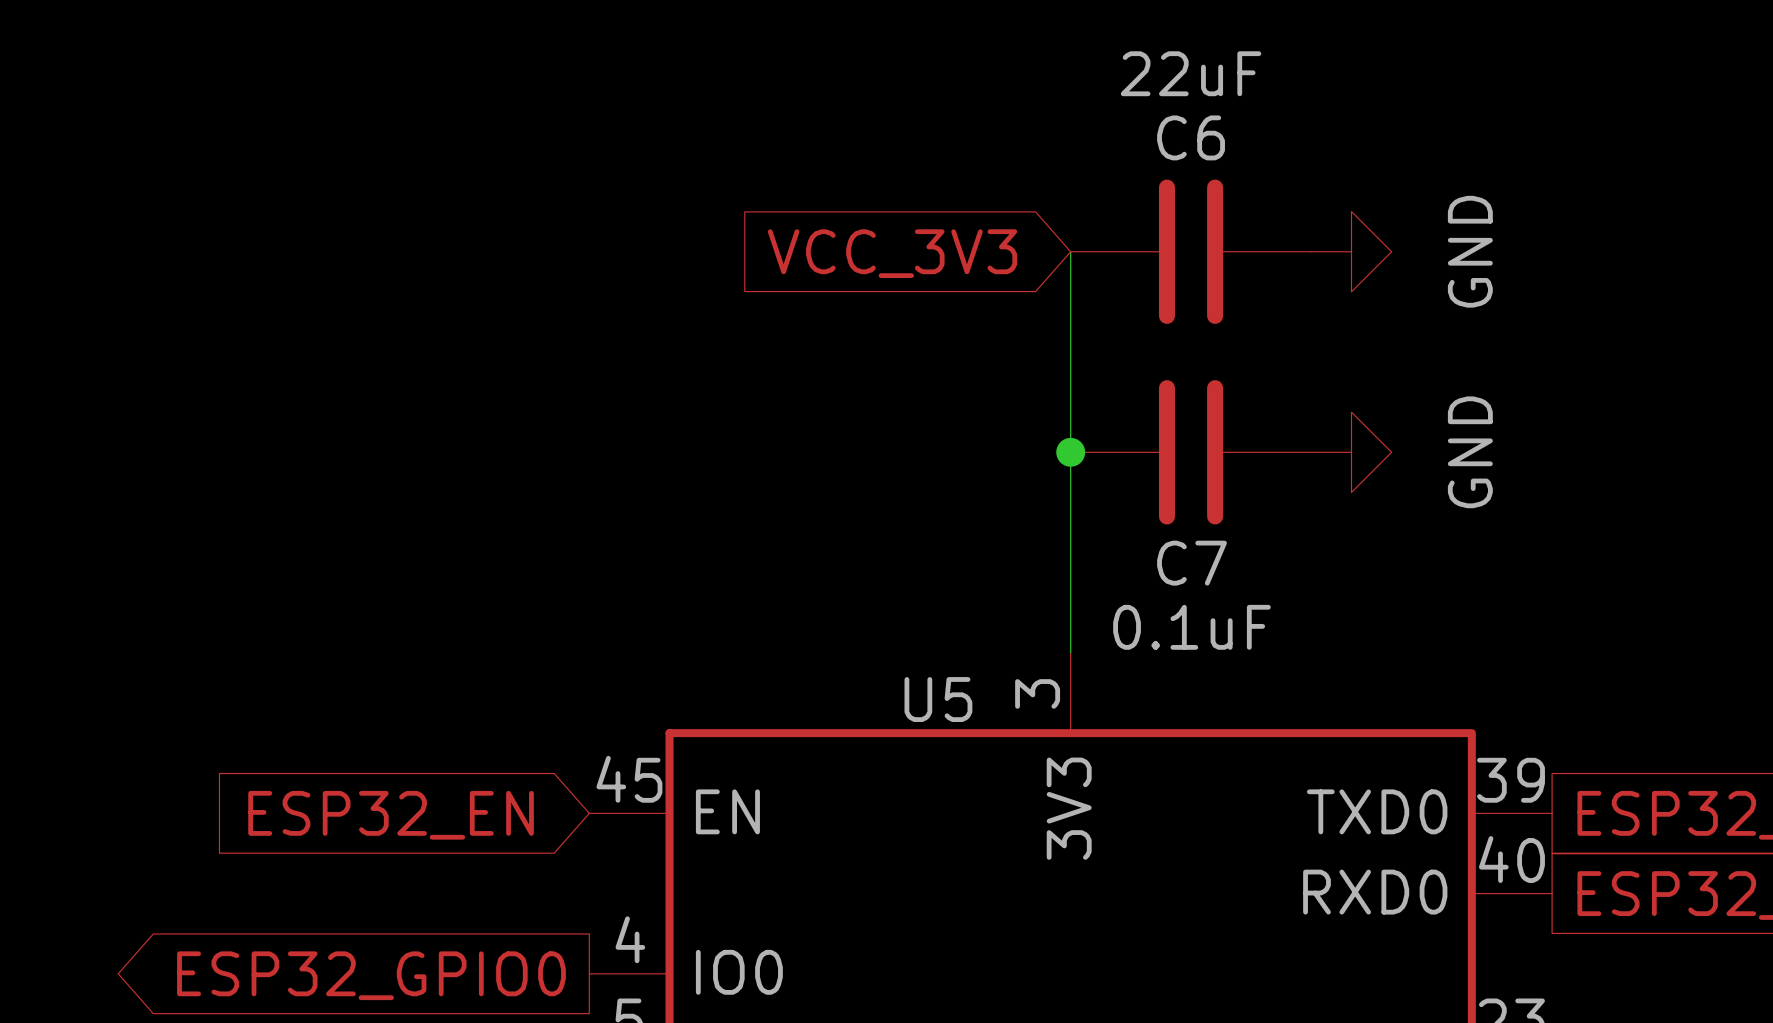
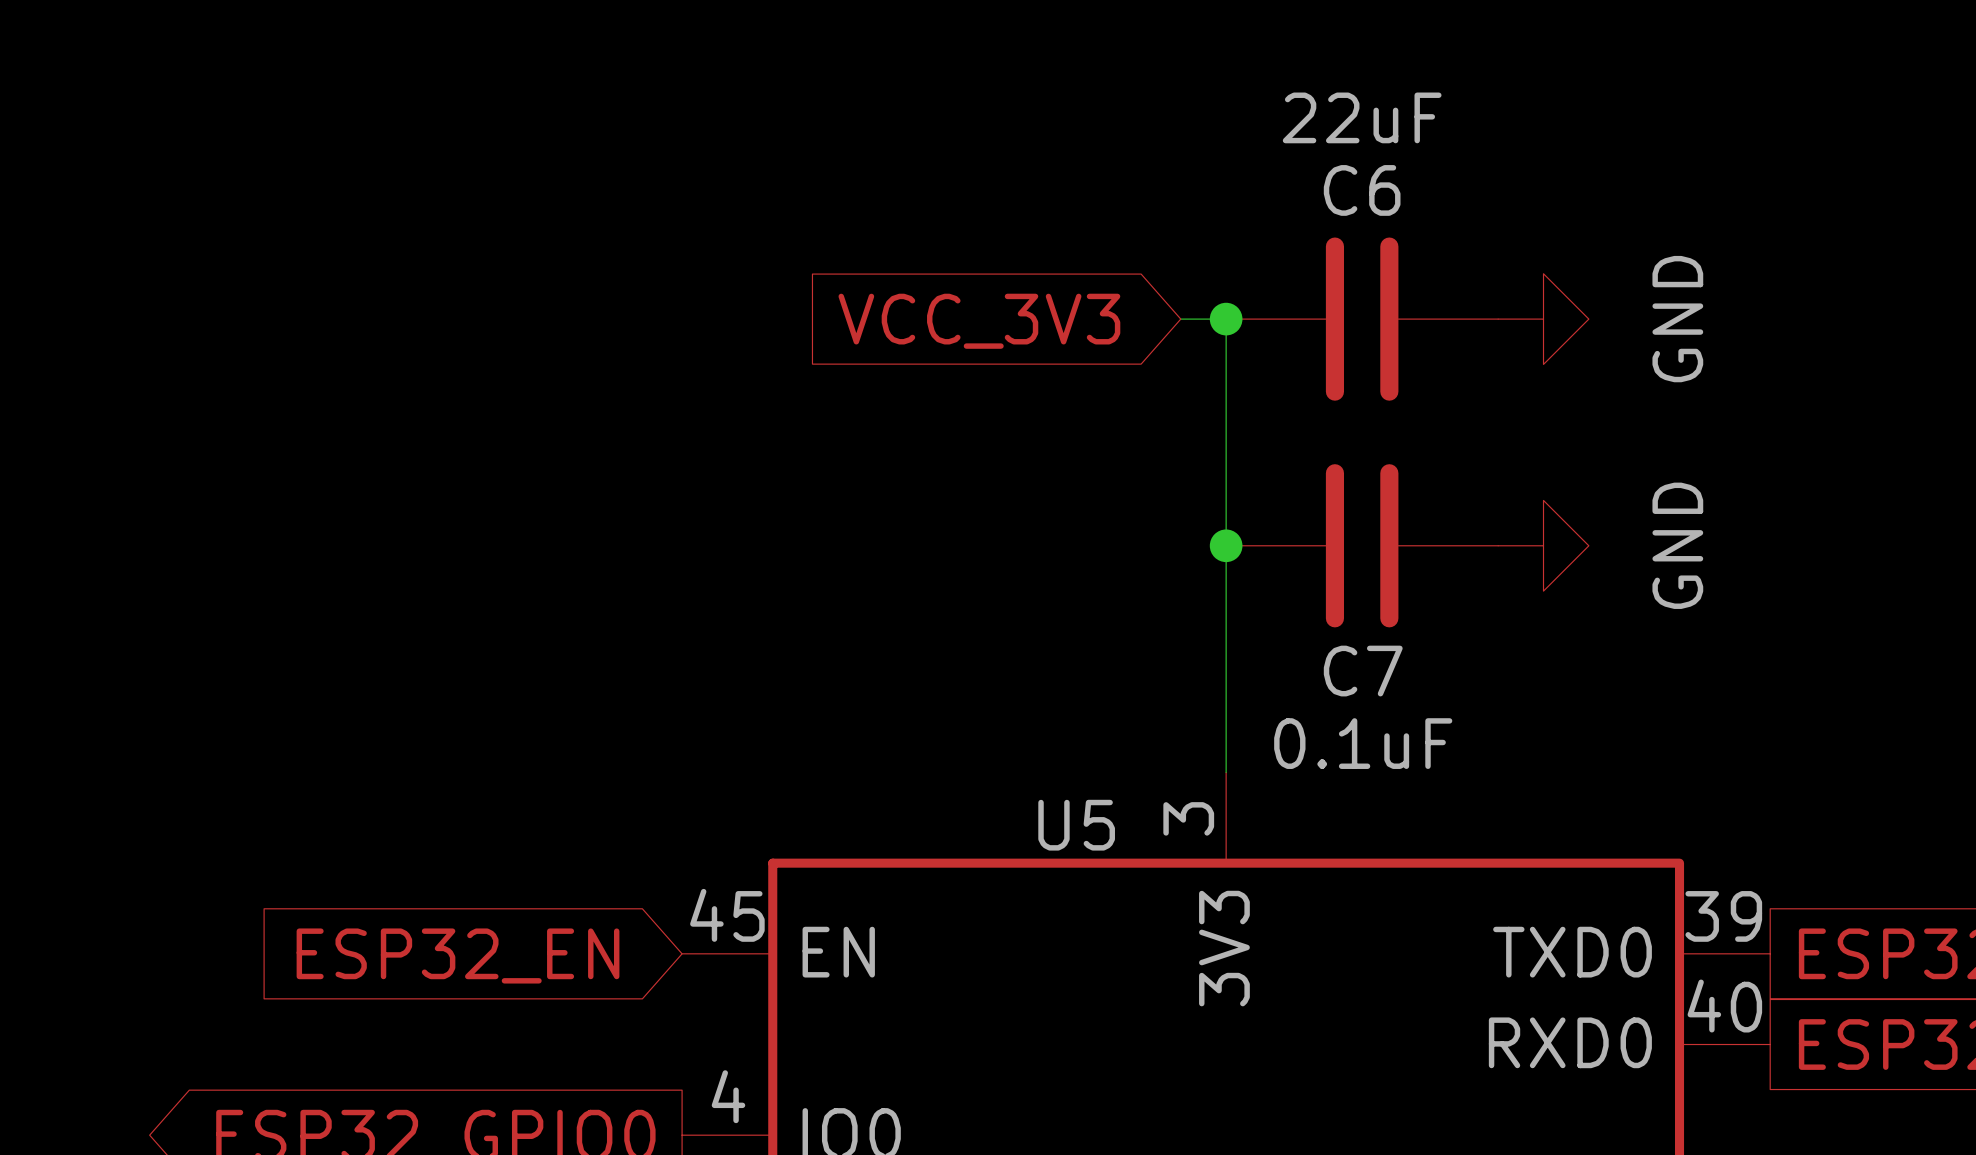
wire: none -> (1180, 319) (1226, 319)
junction: none -> (1226, 319)
global label position: VCC_3V3 (892, 253) -> VCC_3V3 (979, 321)

